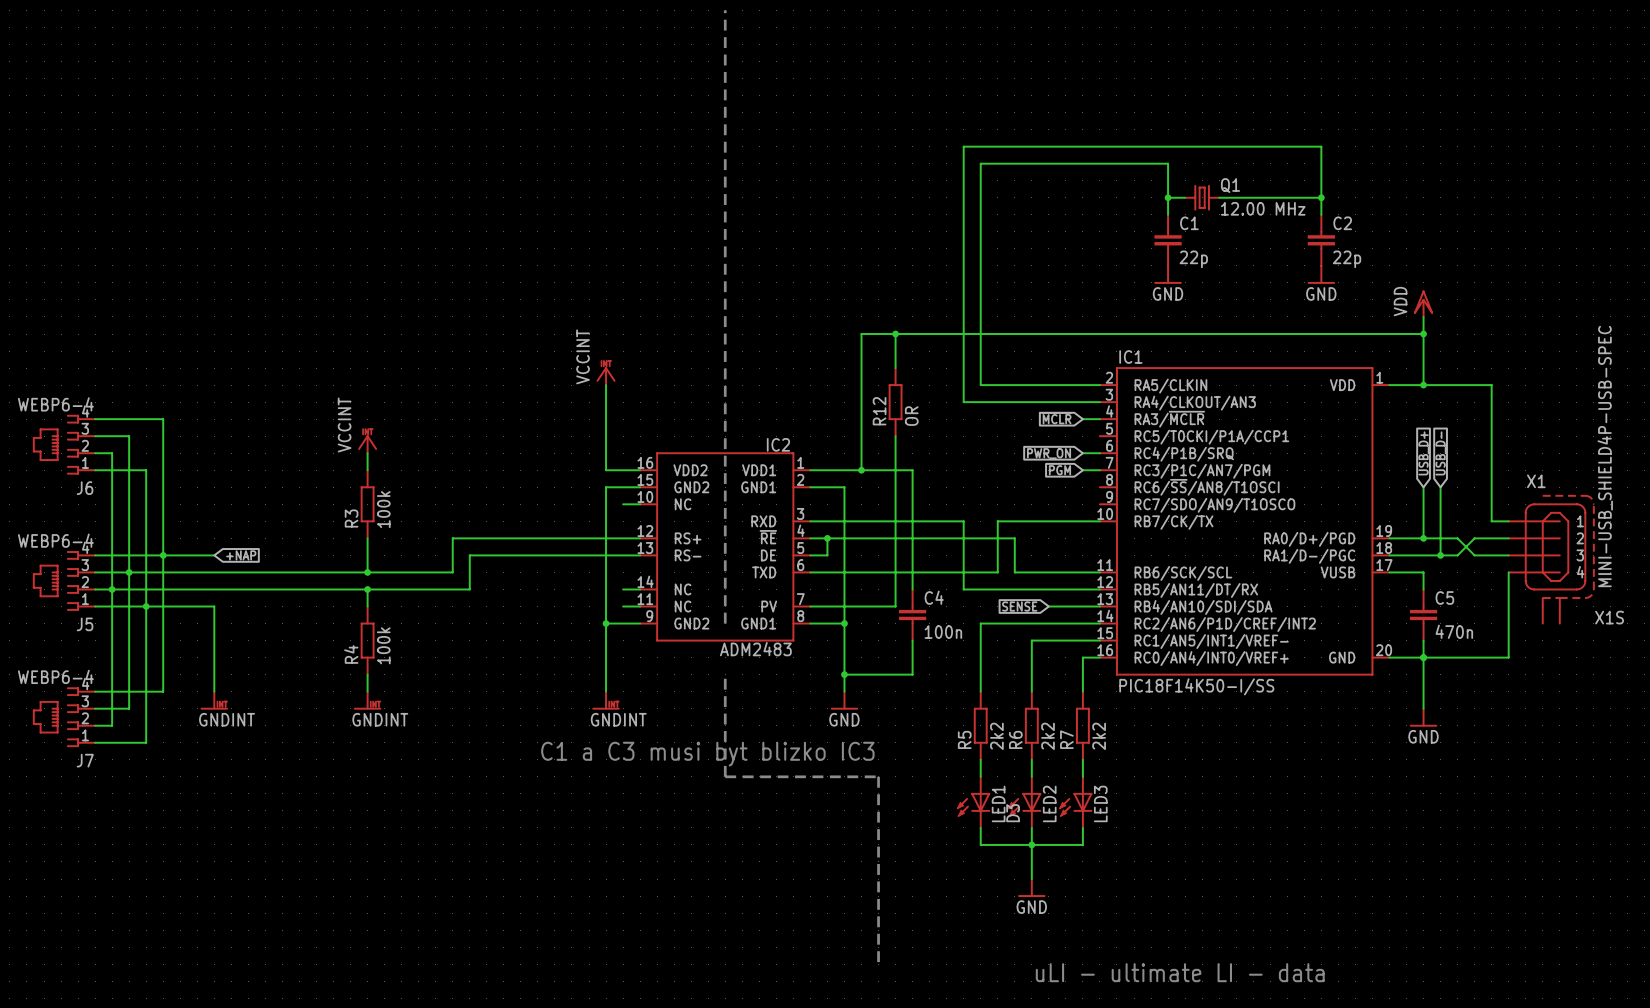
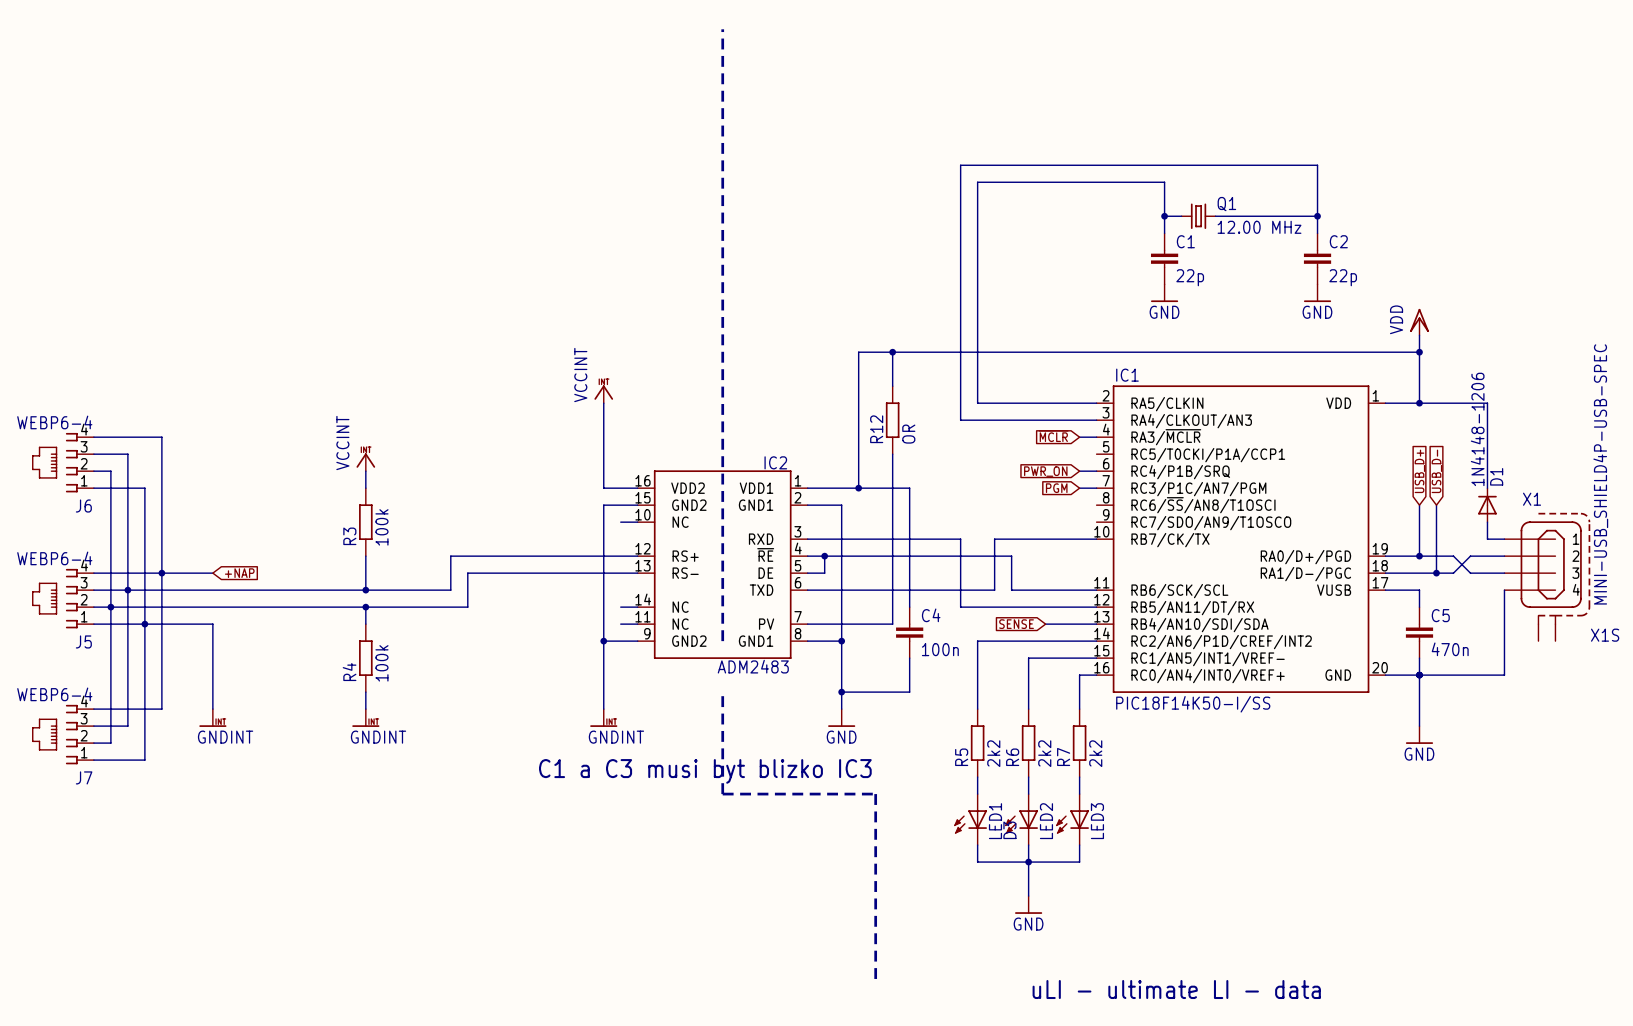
D1: none -> 1N4148-1206 (1487, 505)

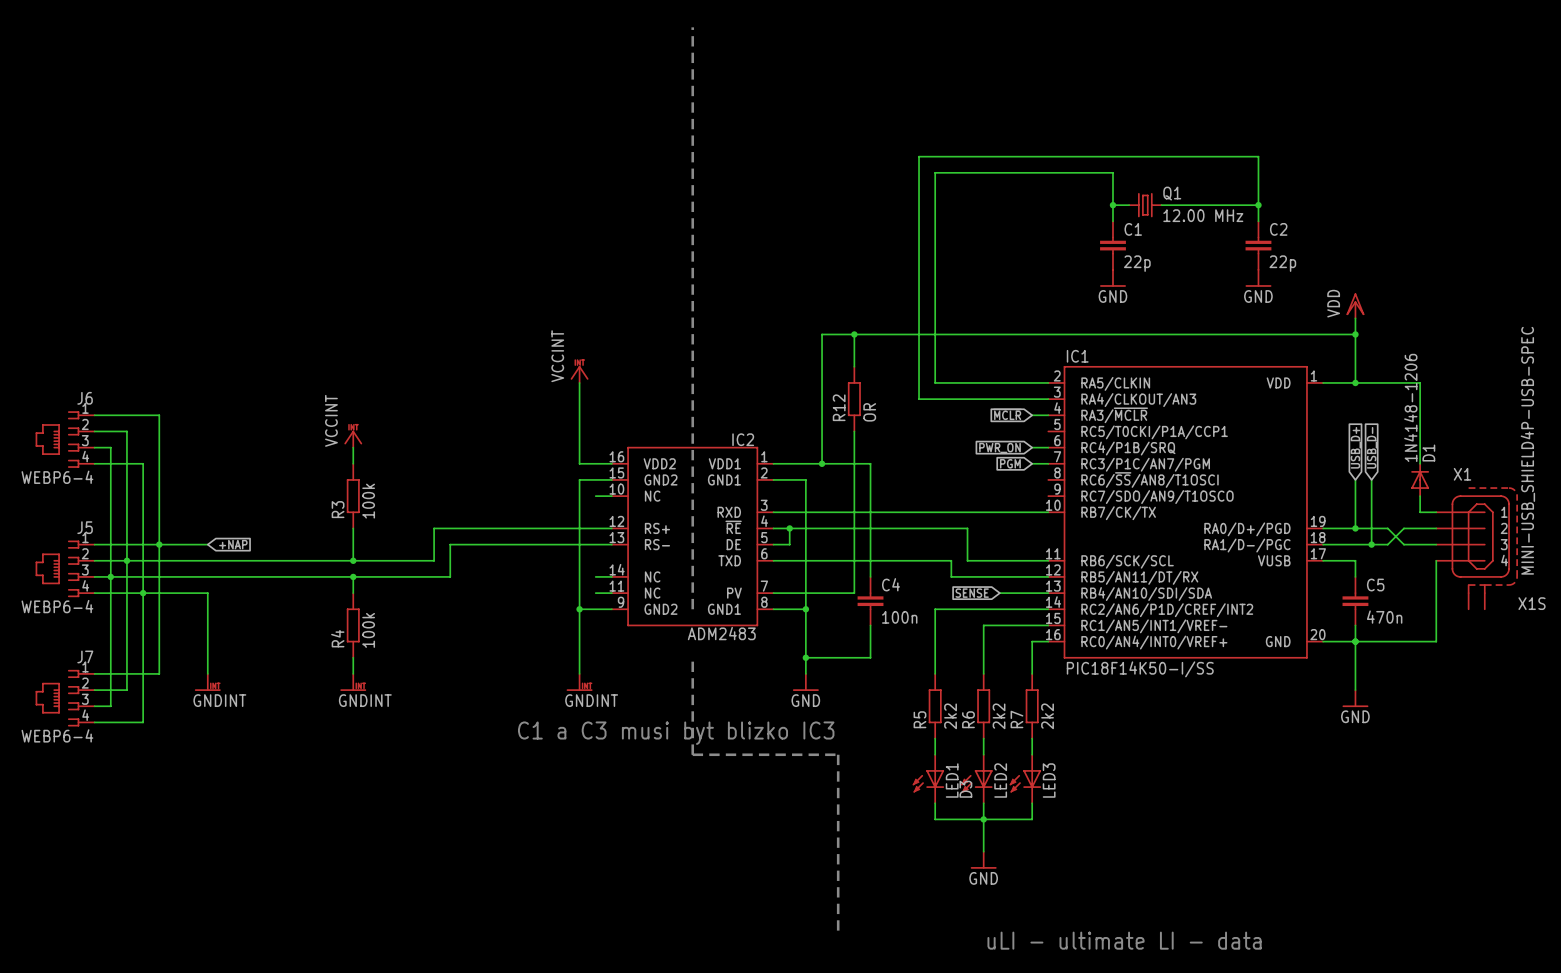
J6 flip: as is (54, 462) -> up-down (57, 439)
wire: (960, 539) (960, 607) (994, 607) -> (951, 560) (951, 576)
wire: (994, 539) (994, 590) -> (951, 512) (919, 512)
J5 flip: as is (54, 598) -> up-down (57, 568)
J7 flip: as is (54, 734) -> up-down (57, 698)

